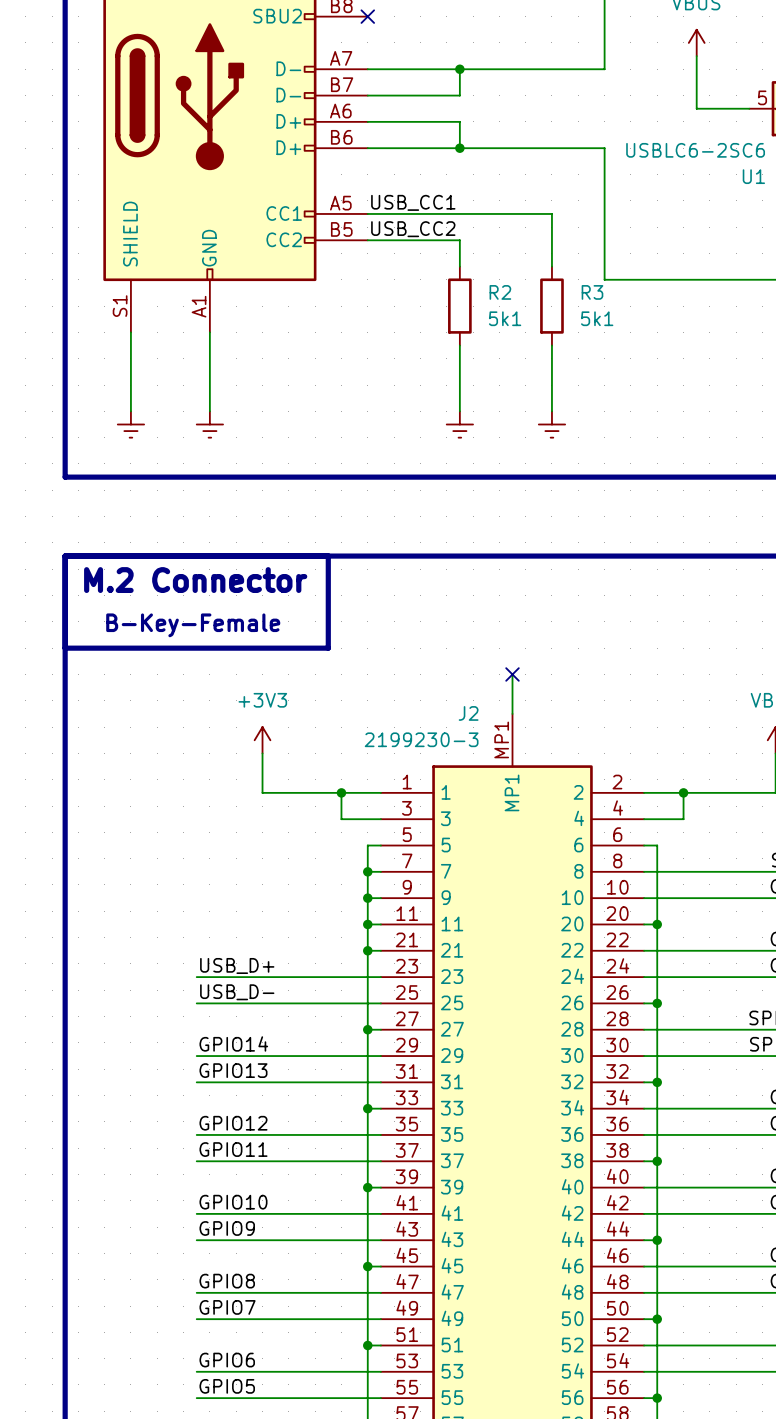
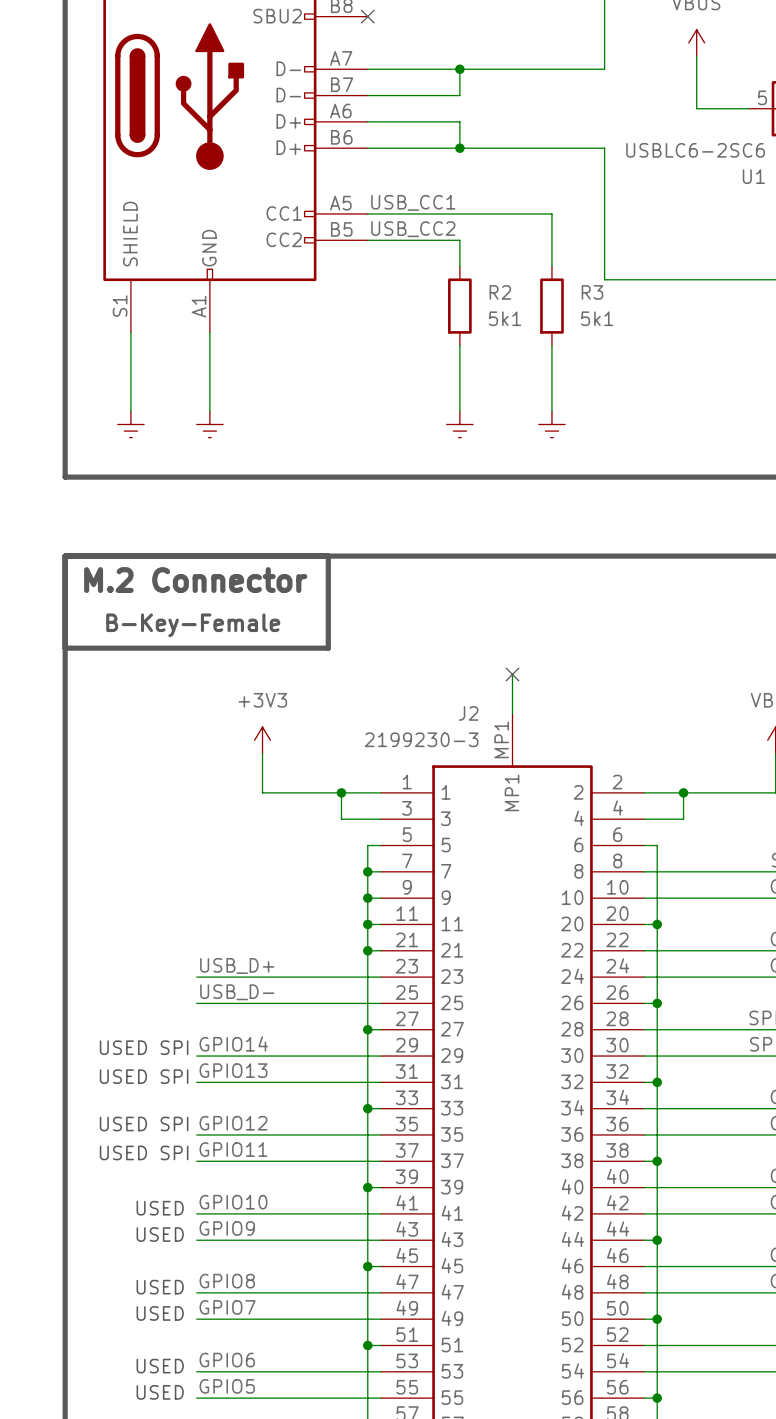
text: none -> USED SPI (144, 1047)
text: none -> USED SPI (144, 1076)
text: none -> USED SPI (144, 1124)
text: none -> USED SPI (144, 1152)
text: none -> USED (160, 1208)
text: none -> USED (160, 1234)
text: none -> USED (160, 1287)
text: none -> USED (160, 1313)
text: none -> USED (160, 1366)
text: none -> USED (160, 1392)

